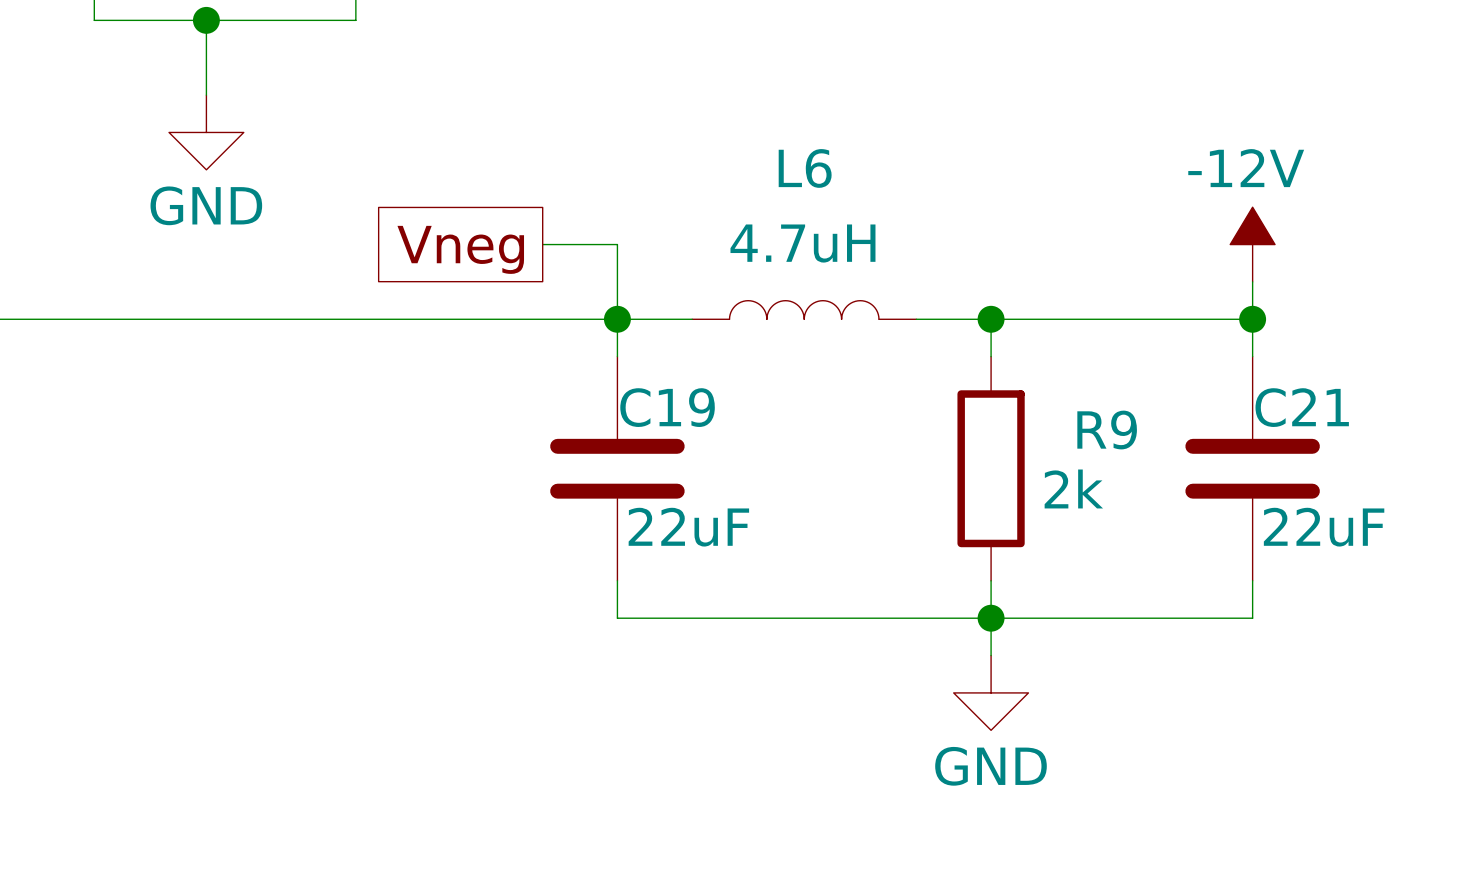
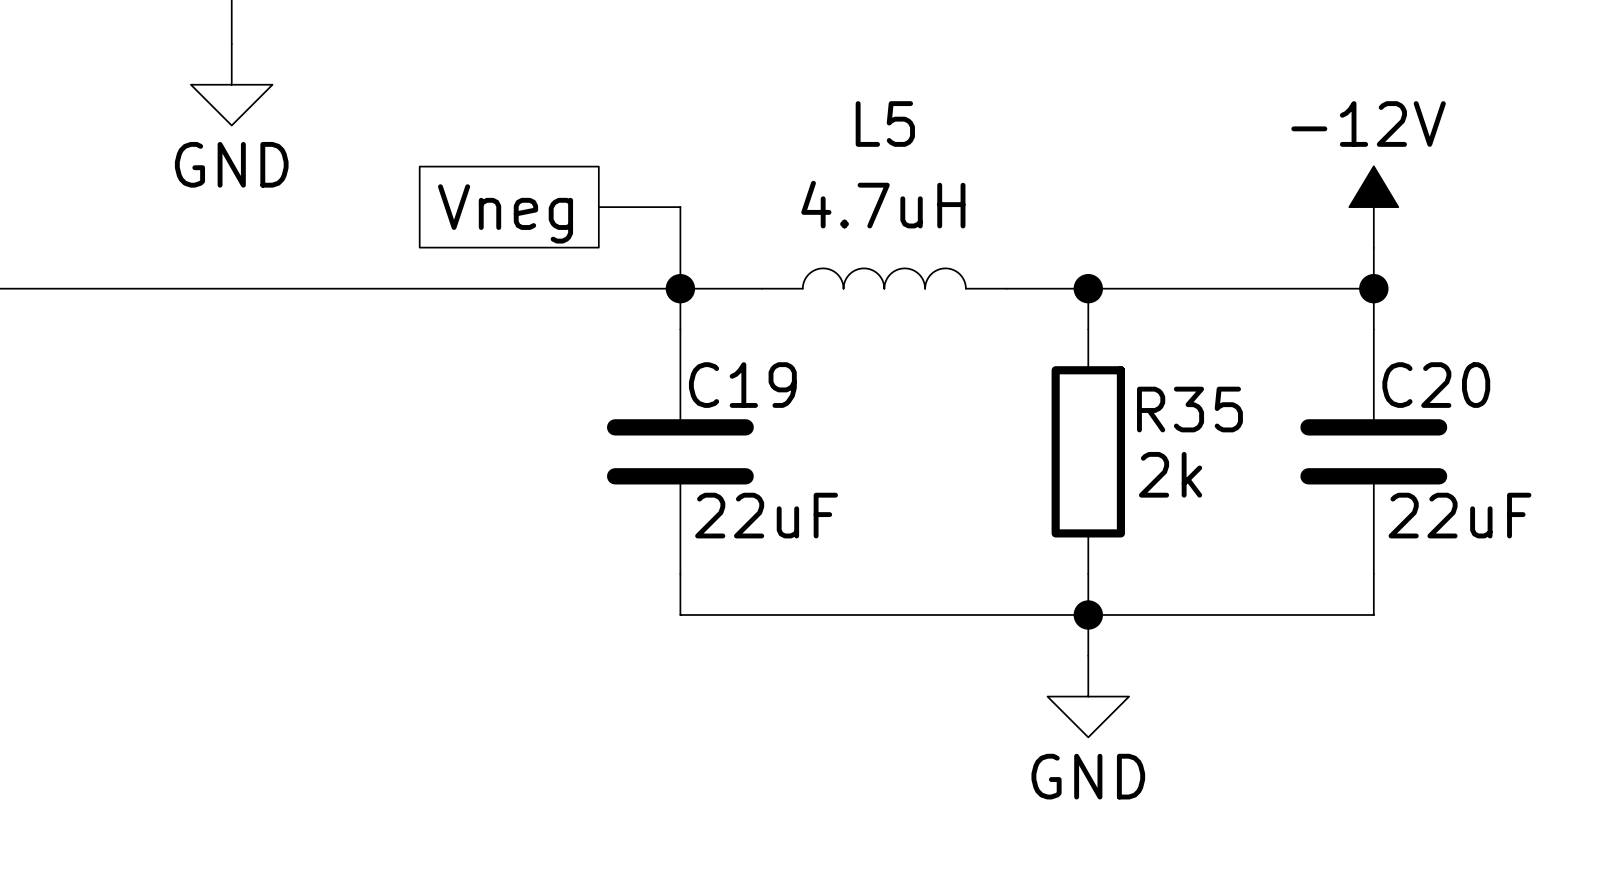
L6 name: L6 (805, 168) -> L5 (885, 124)
C21 name: C21 (1302, 407) -> C20 (1436, 385)
R9 name: R9 (1107, 430) -> R35 (1189, 409)

